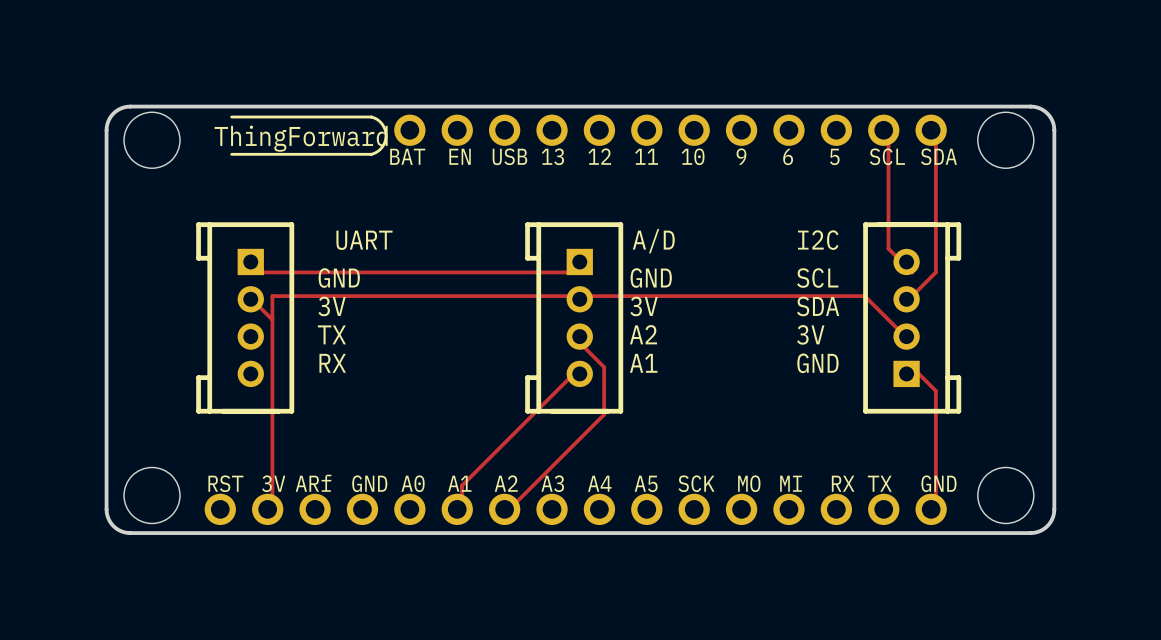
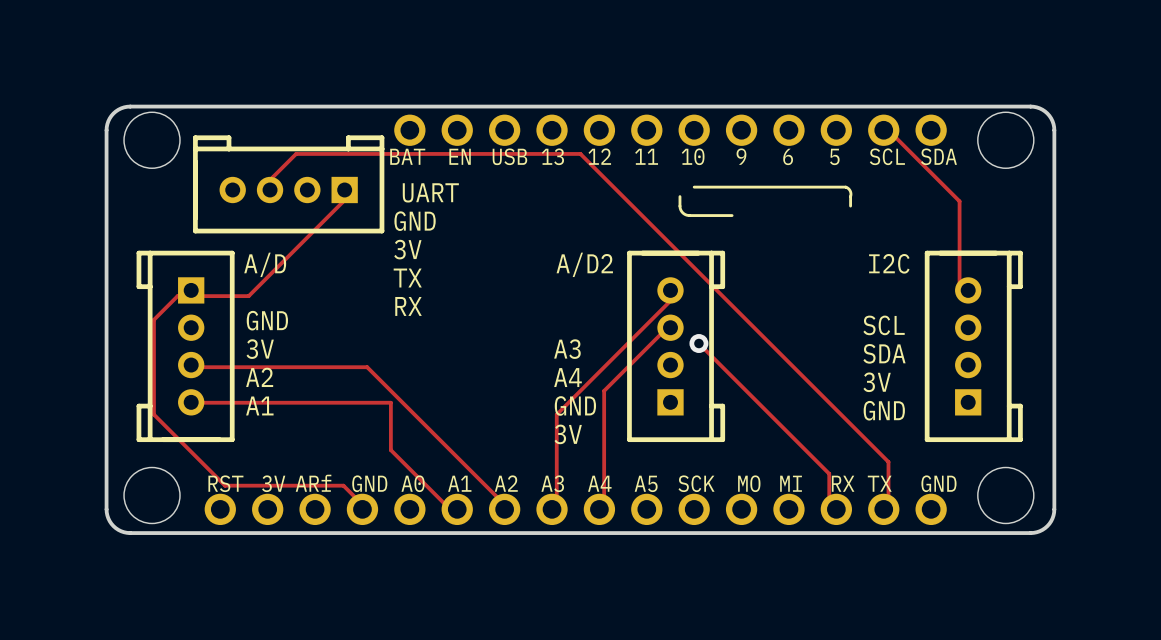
line: (231, 117) (371, 117) (382, 124) (386, 135) (382, 146) (371, 154) (231, 154) -> none
track: (888, 130) (888, 248) (912, 272) (906, 261) -> (888, 130) (959, 201) (959, 296) (968, 290)
track: (931, 130) (935, 130) (935, 272) (906, 299) -> none
text: ThingForward (301, 138) -> none
part: none -> (288, 184)
line: none -> (694, 187) (845, 187) (850, 192) (850, 206)
track: none -> (270, 190) (272, 177) (296, 153) (580, 153) (888, 461) (888, 509) (883, 509)
track: none -> (344, 190) (343, 201) (248, 296) (177, 296) (153, 319) (153, 414) (225, 485) (343, 485) (367, 509) (362, 509)
line: none -> (679, 196) (680, 208) (685, 214) (732, 215)
text: none -> GND (415, 221)
text position: UART (364, 240) -> UART (430, 192)
text position: I2C (818, 240) -> I2C (889, 263)
text position: A/D (653, 241) -> A/D (265, 264)
text: none -> 3V (407, 249)
track: (250, 261) (248, 272) (580, 272) (579, 261) -> none
text: none -> A/D2 (584, 264)
text: GND (339, 278) -> none
text: GND (651, 278) -> none
text position: SCL (817, 278) -> SCL (884, 325)
track: none -> (670, 290) (675, 296) (556, 414) (556, 509) (552, 509)
track: (250, 299) (248, 296) (272, 319) -> none
text: 3V (332, 306) -> none
text: 3V (644, 306) -> none
text position: SDA (818, 306) -> SDA (884, 353)
part position: (245, 317) -> (185, 346)
part rotation: 0° (574, 317) -> 180° (676, 346)
part position: (912, 317) -> (973, 346)
text: none -> GND (267, 320)
text position: TX (331, 334) -> TX (407, 278)
text position: A2 (643, 334) -> A2 (259, 377)
text position: 3V (810, 334) -> 3V (877, 382)
track: (579, 336) (580, 343) (604, 367) (604, 390) -> (670, 327) (675, 319) (604, 390)
track: (906, 336) (912, 343) (864, 296) (272, 296) (272, 509) (267, 509) -> none
track: none -> (698, 343) (829, 473) (829, 509) (836, 509)
via: none -> (698, 343)
text: none -> 3V (260, 349)
text: none -> A3 (567, 349)
text position: RX (332, 363) -> RX (408, 306)
text position: A1 (643, 363) -> A1 (259, 405)
text position: GND (817, 363) -> GND (884, 410)
track: none -> (191, 365) (201, 367) (367, 367) (509, 509)
track: (579, 373) (580, 367) (461, 485) (461, 509) (457, 509) -> (191, 402) (390, 402) (390, 450) (450, 509) (457, 509)
track: (906, 373) (912, 367) (935, 390) (935, 509) (931, 509) -> none
text: none -> A4 (567, 377)
text: none -> GND (575, 405)
track: (604, 414) (509, 509) -> (604, 414) (604, 509) (599, 509)
text: none -> 3V (568, 434)

